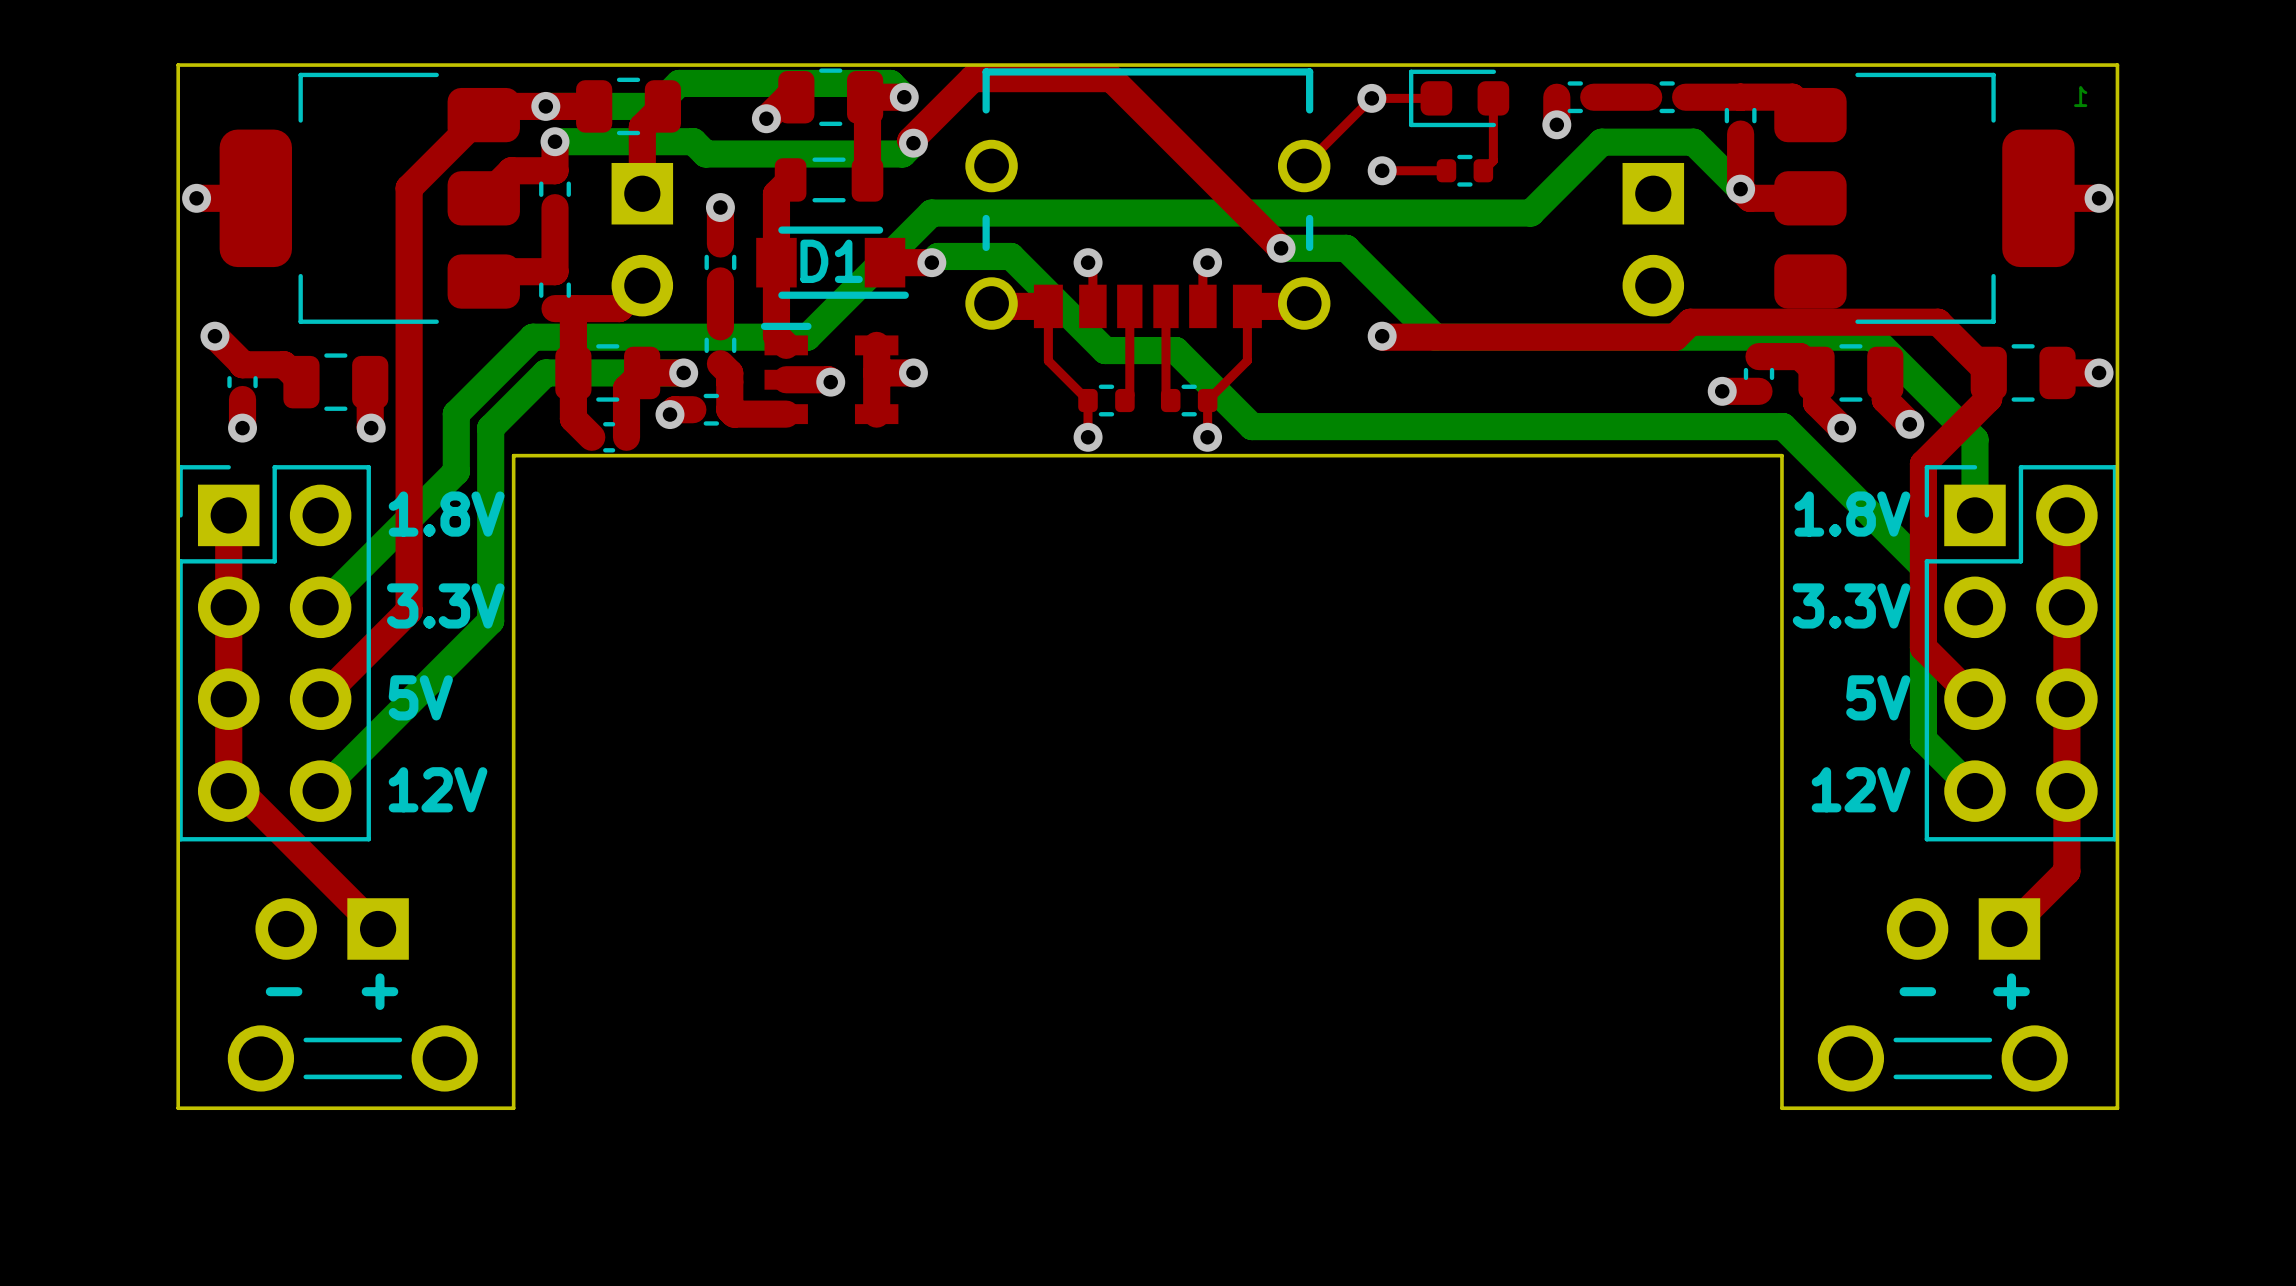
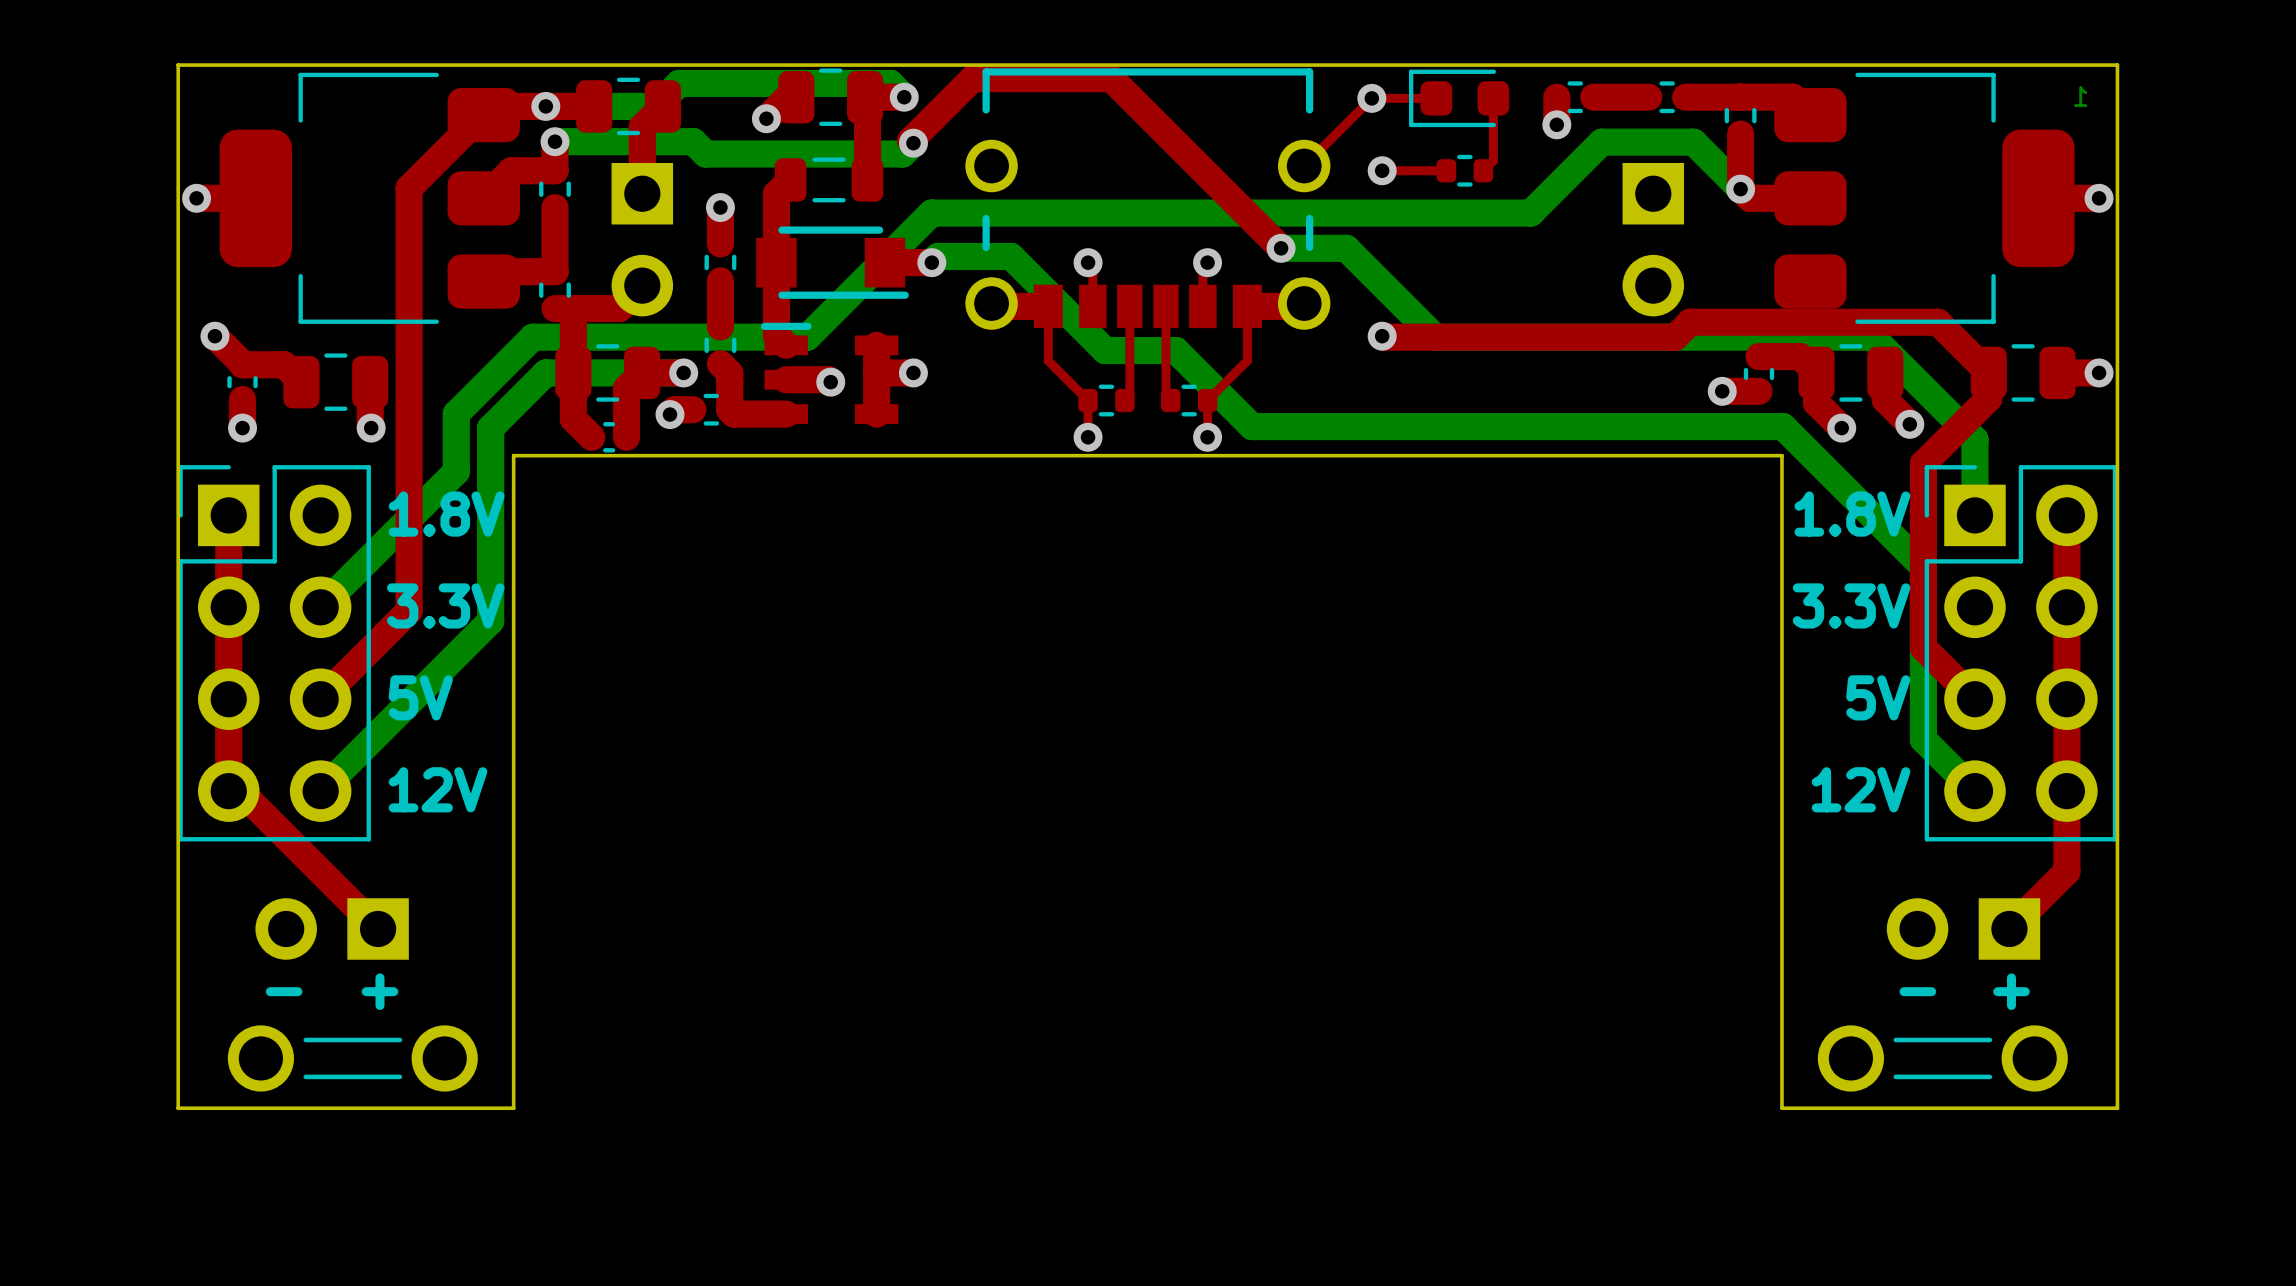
D1 name: D1 (831, 261) -> none

